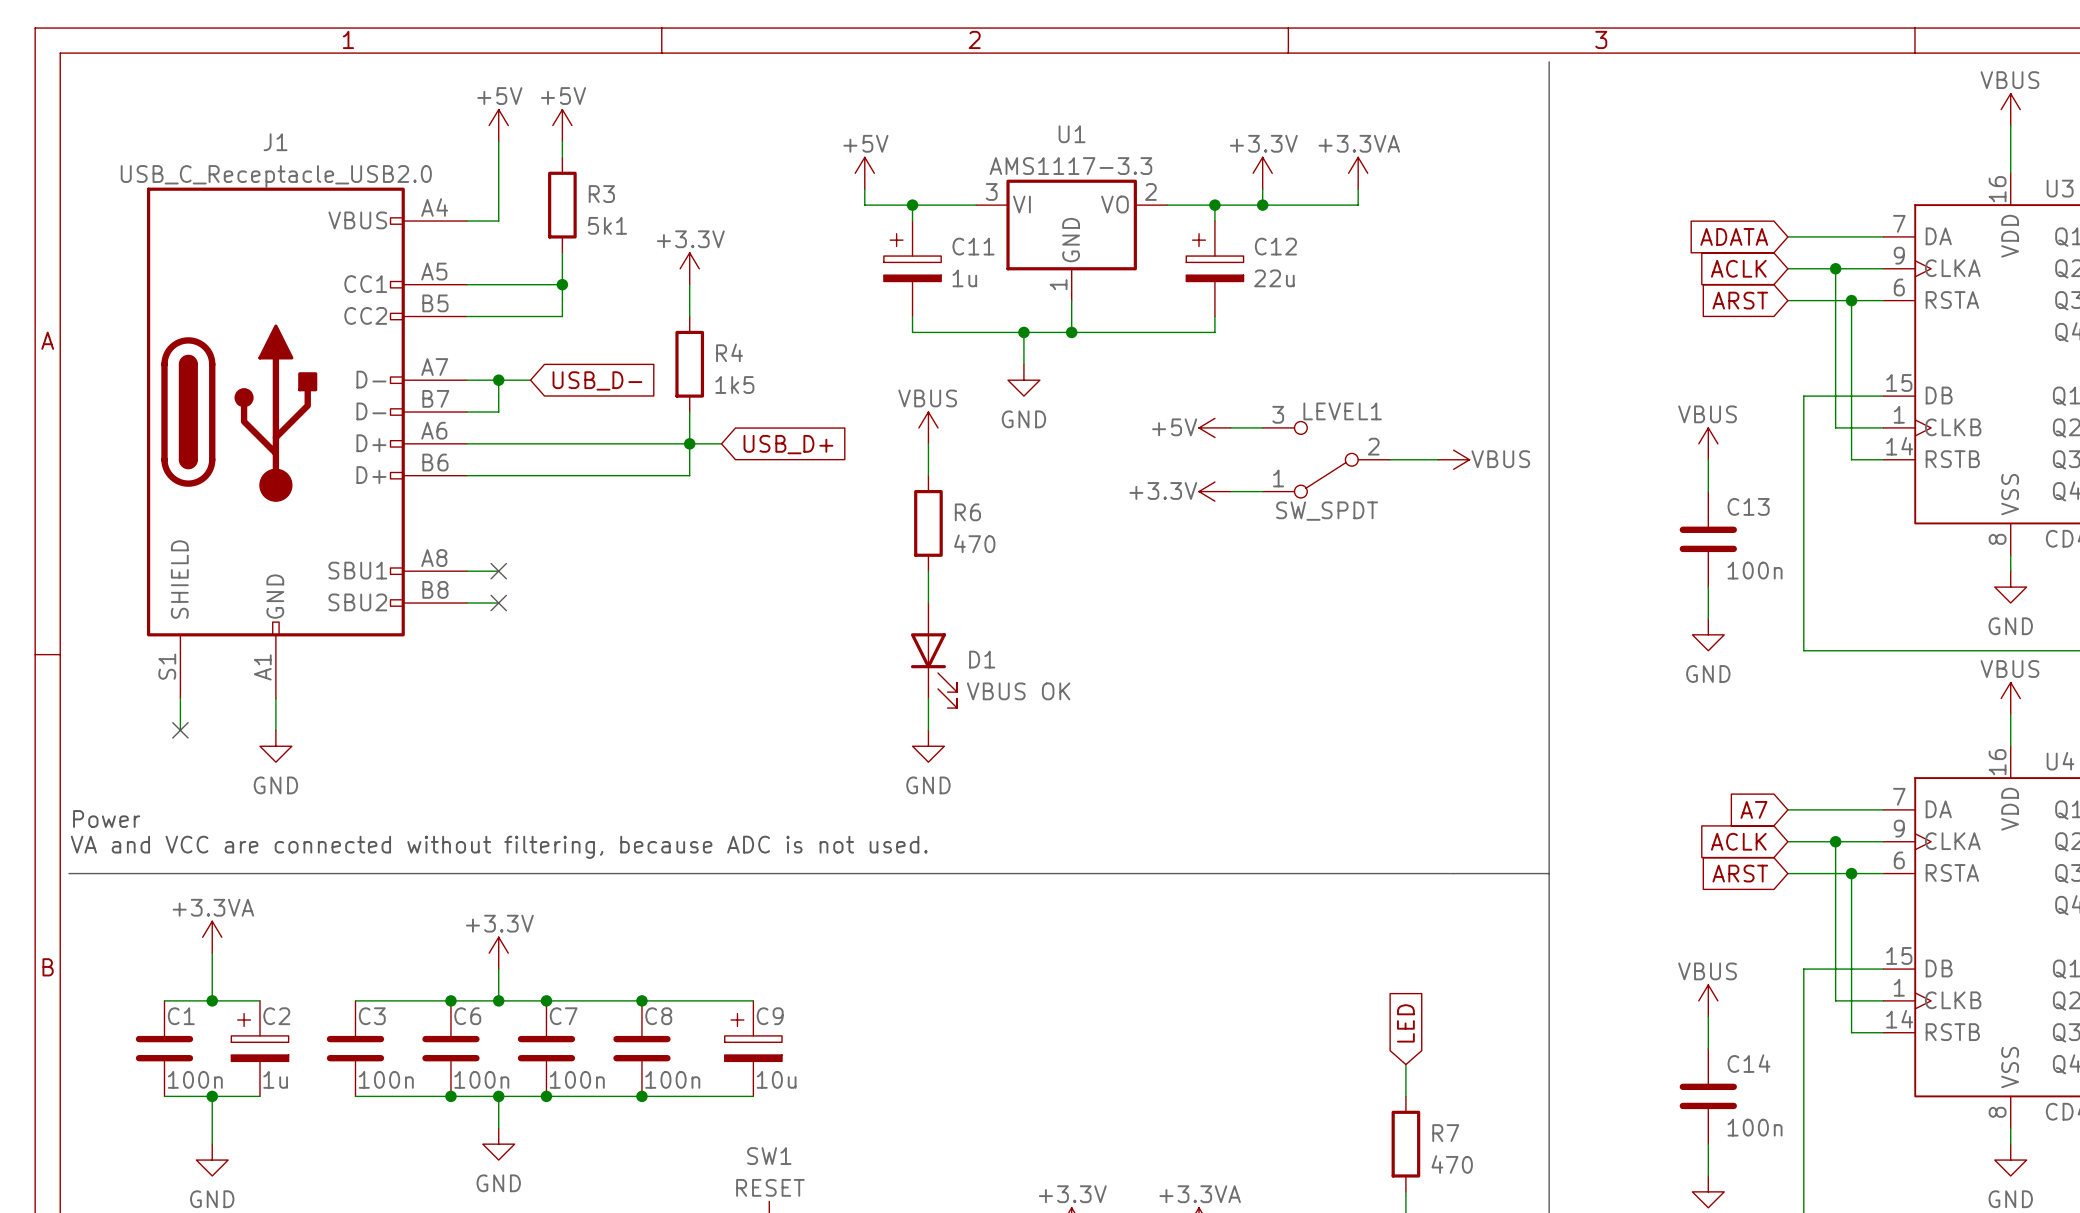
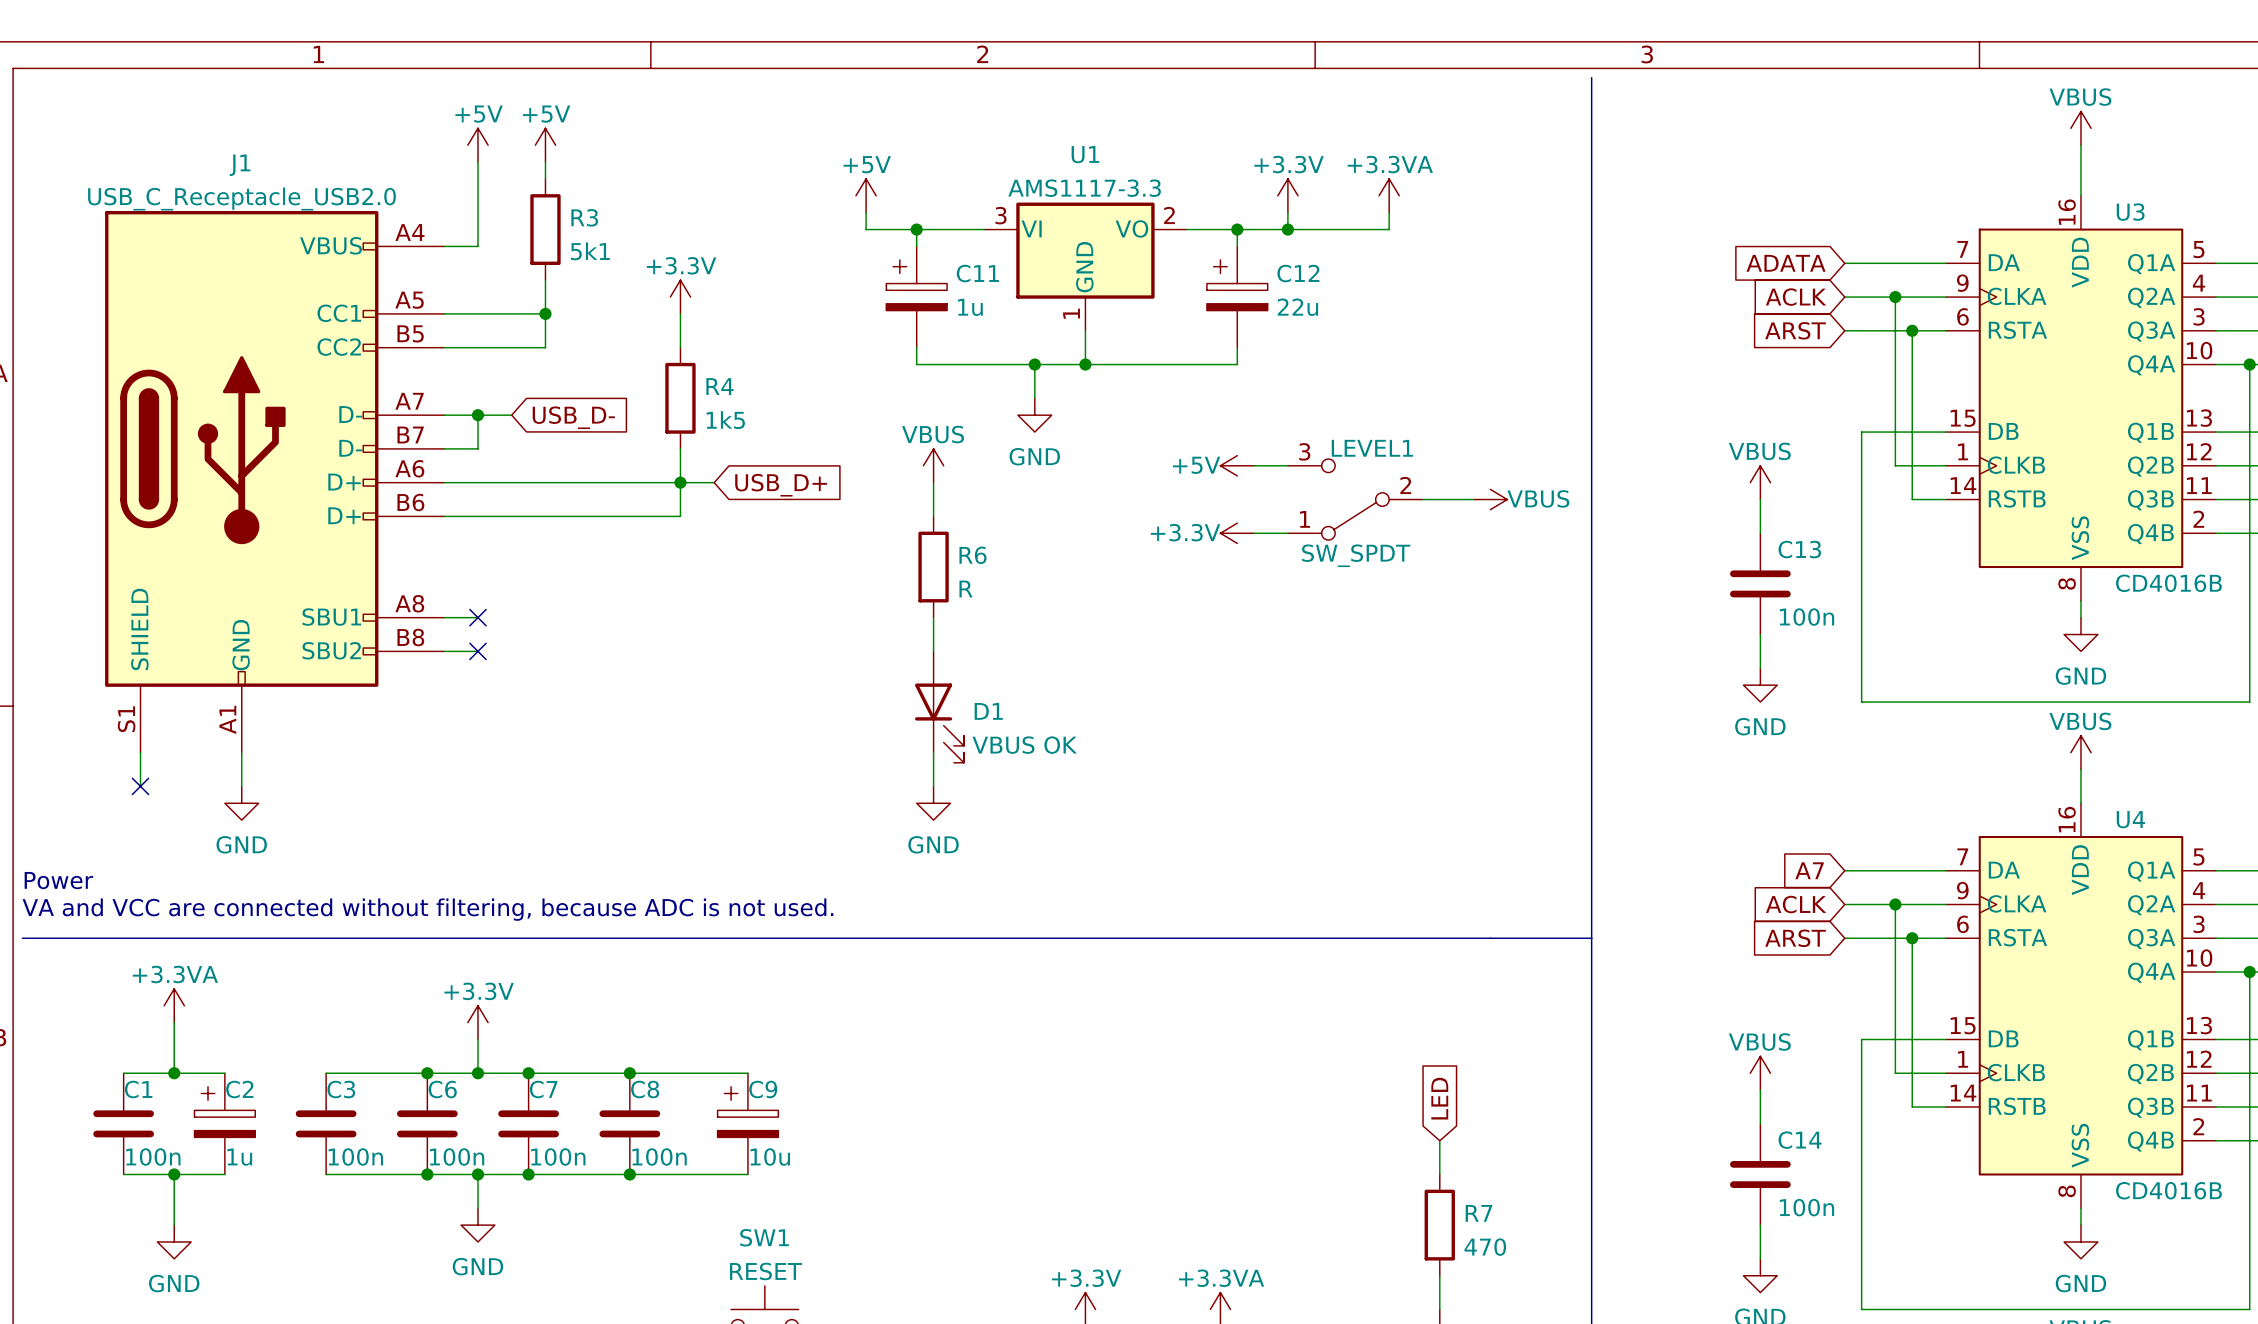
R6 value: 470 (974, 543) -> R (966, 589)

